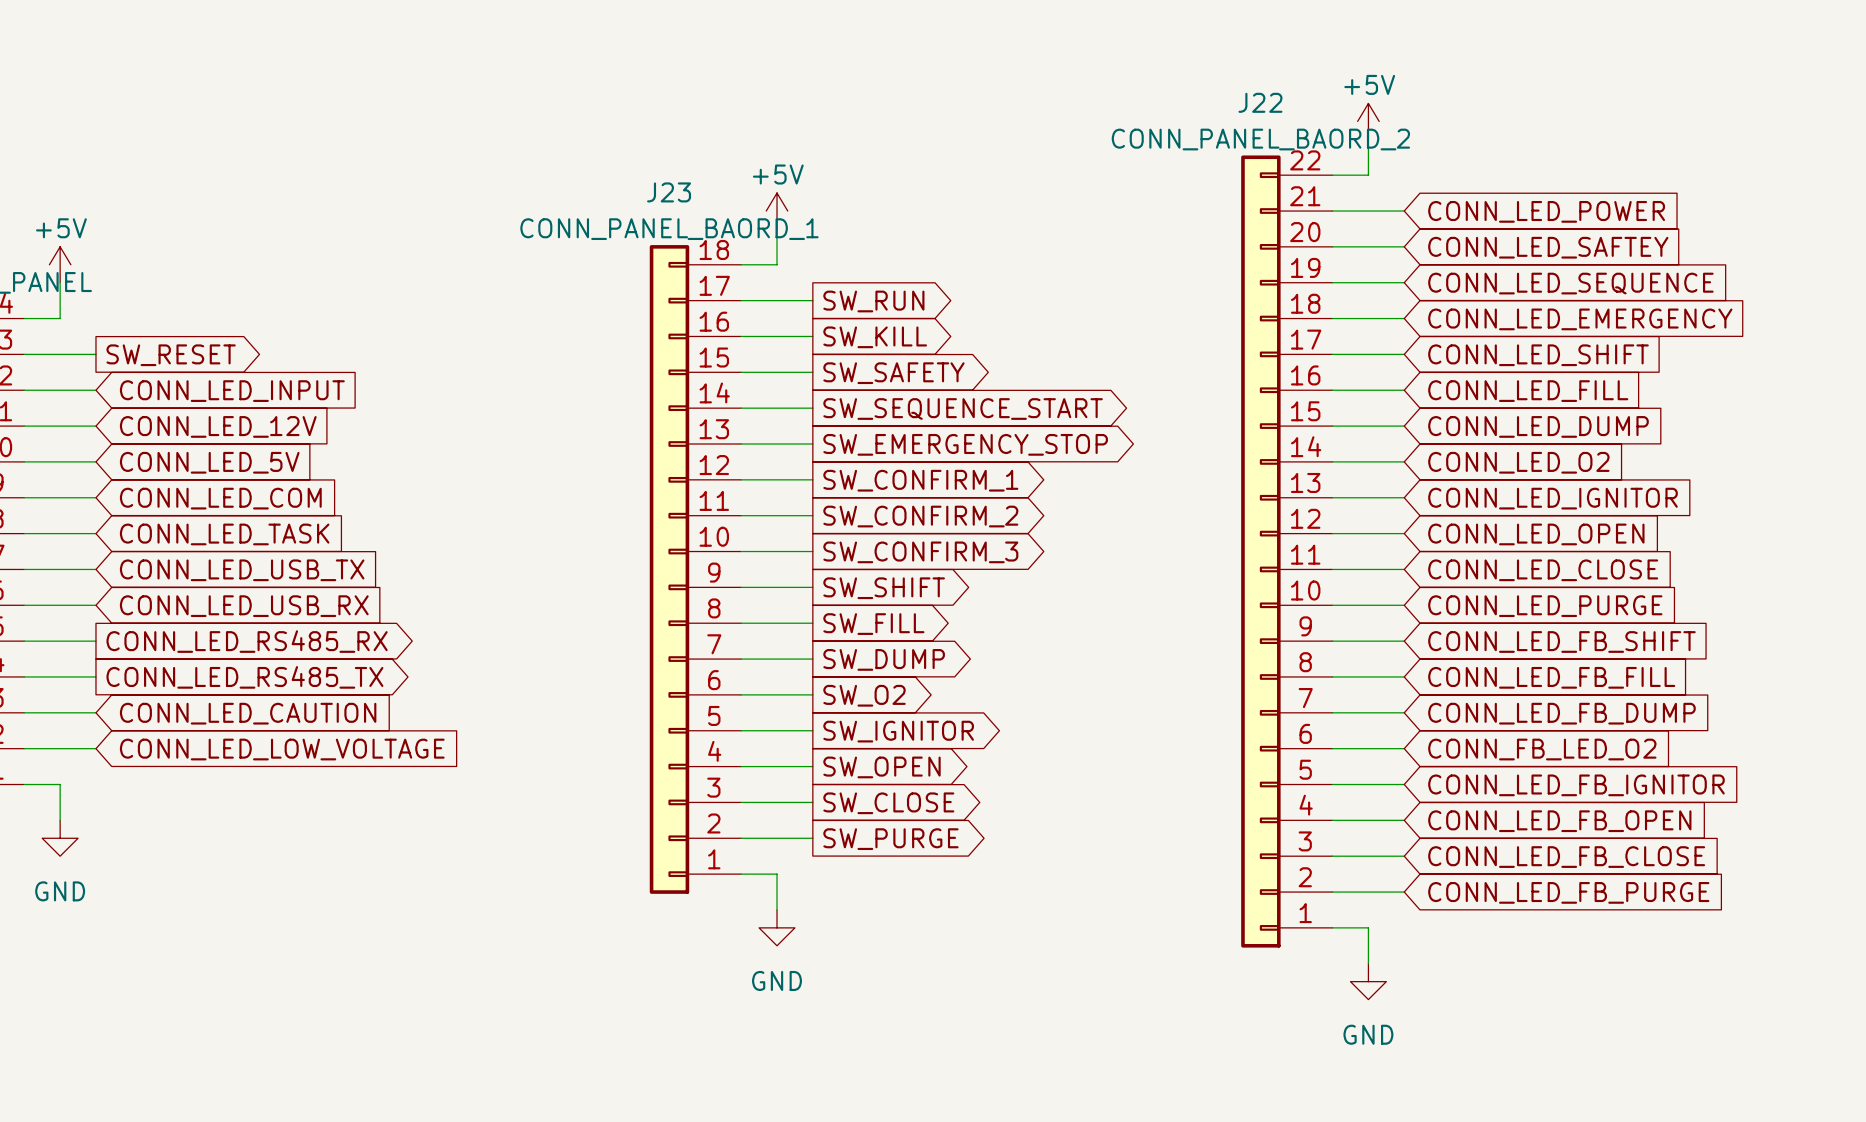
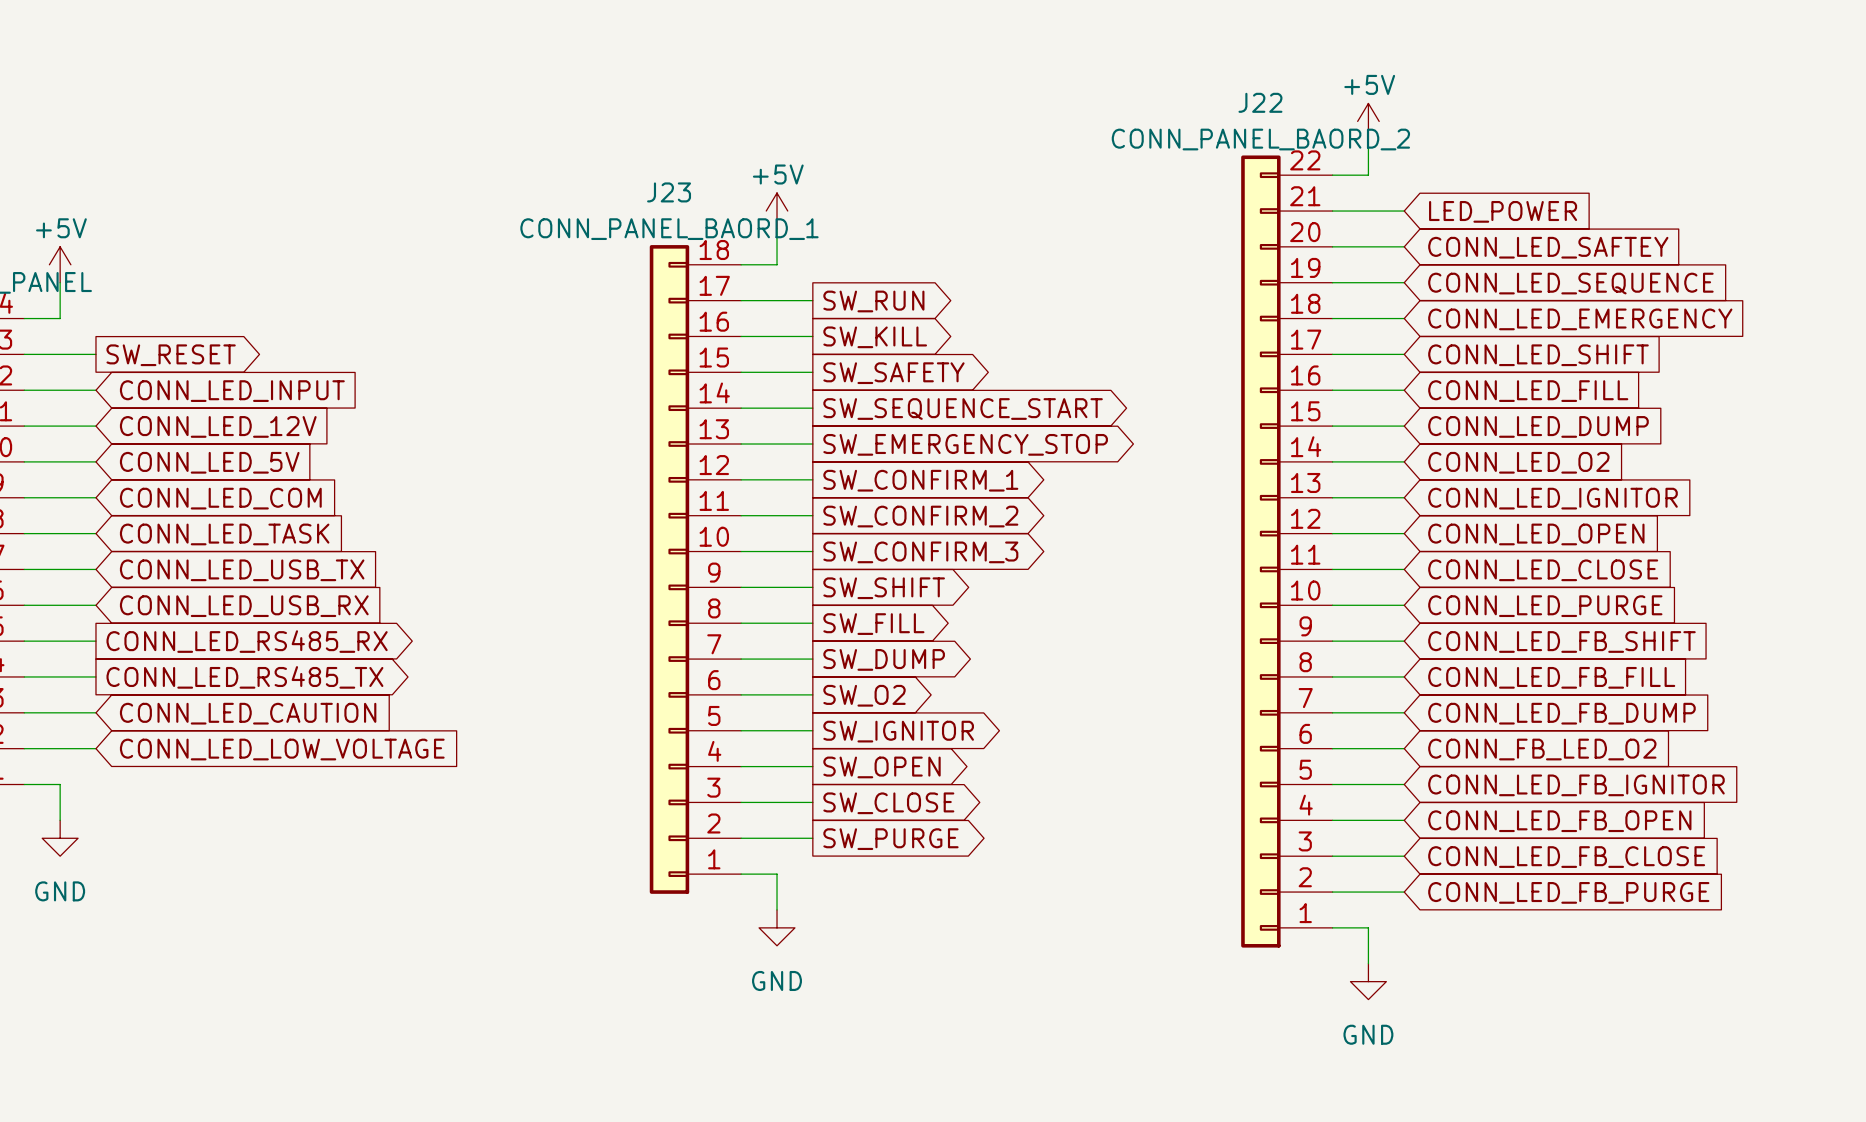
global label: CONN_LED_POWER (1546, 211) -> LED_POWER (1503, 211)

